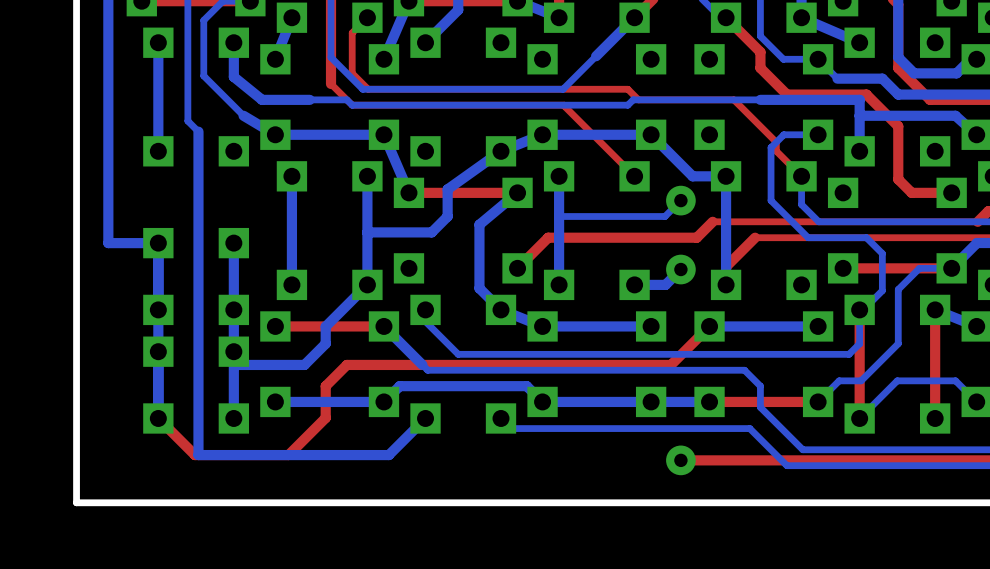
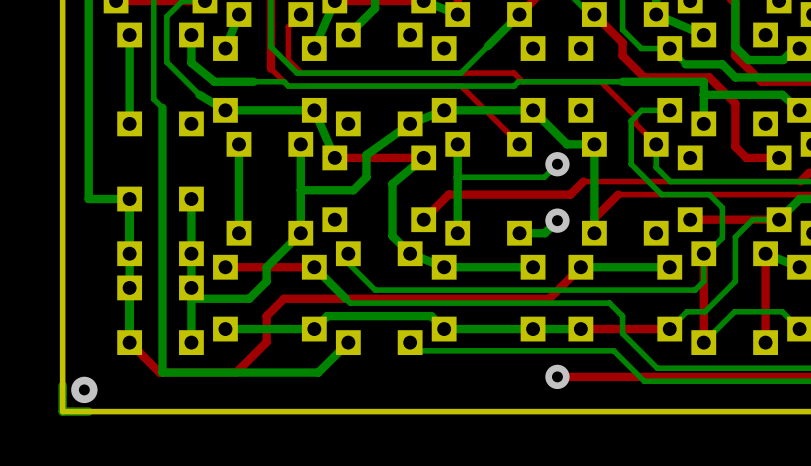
bottom track: none -> (62, 385) (62, 411) (88, 411)
via: none -> (84, 389)

